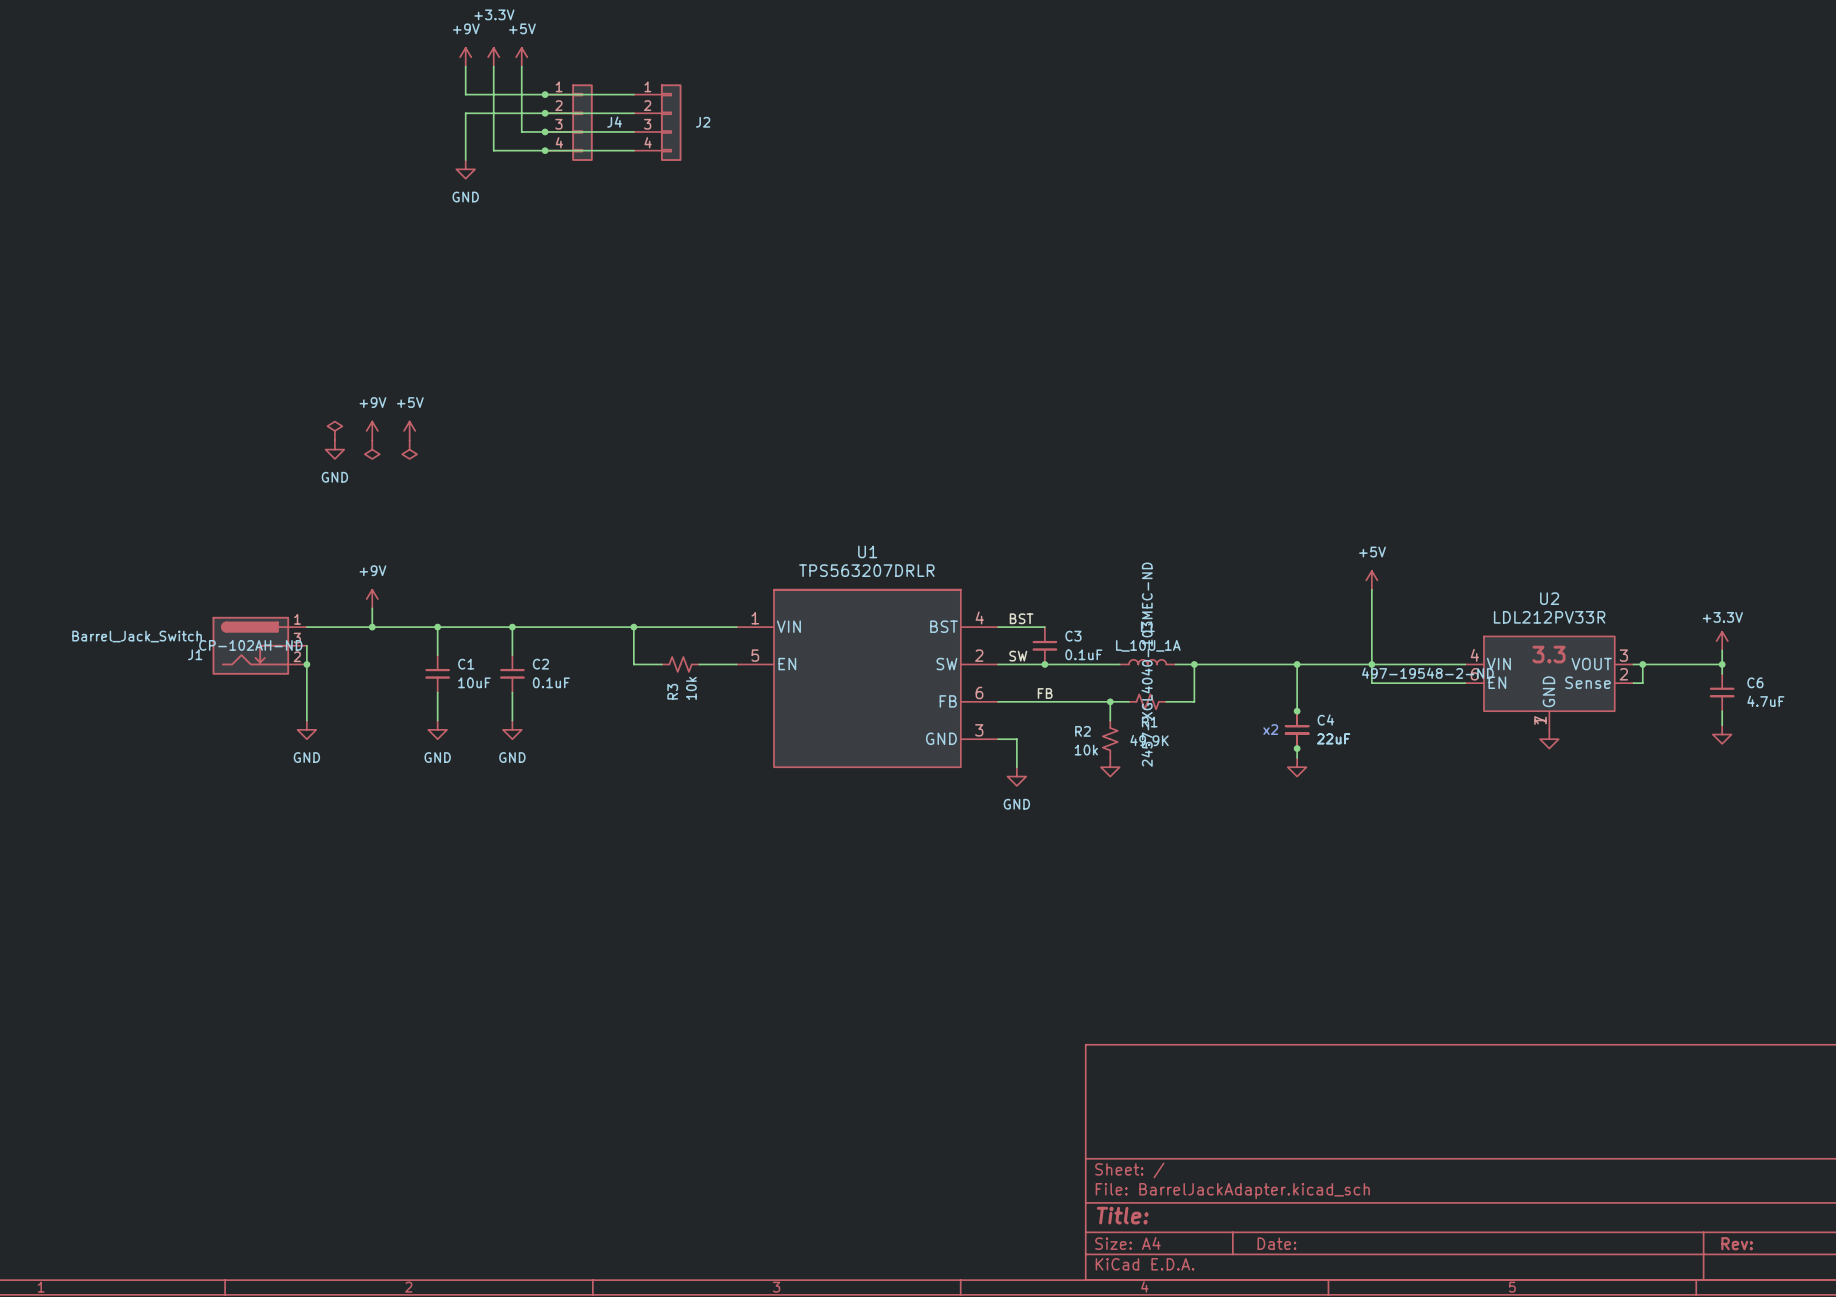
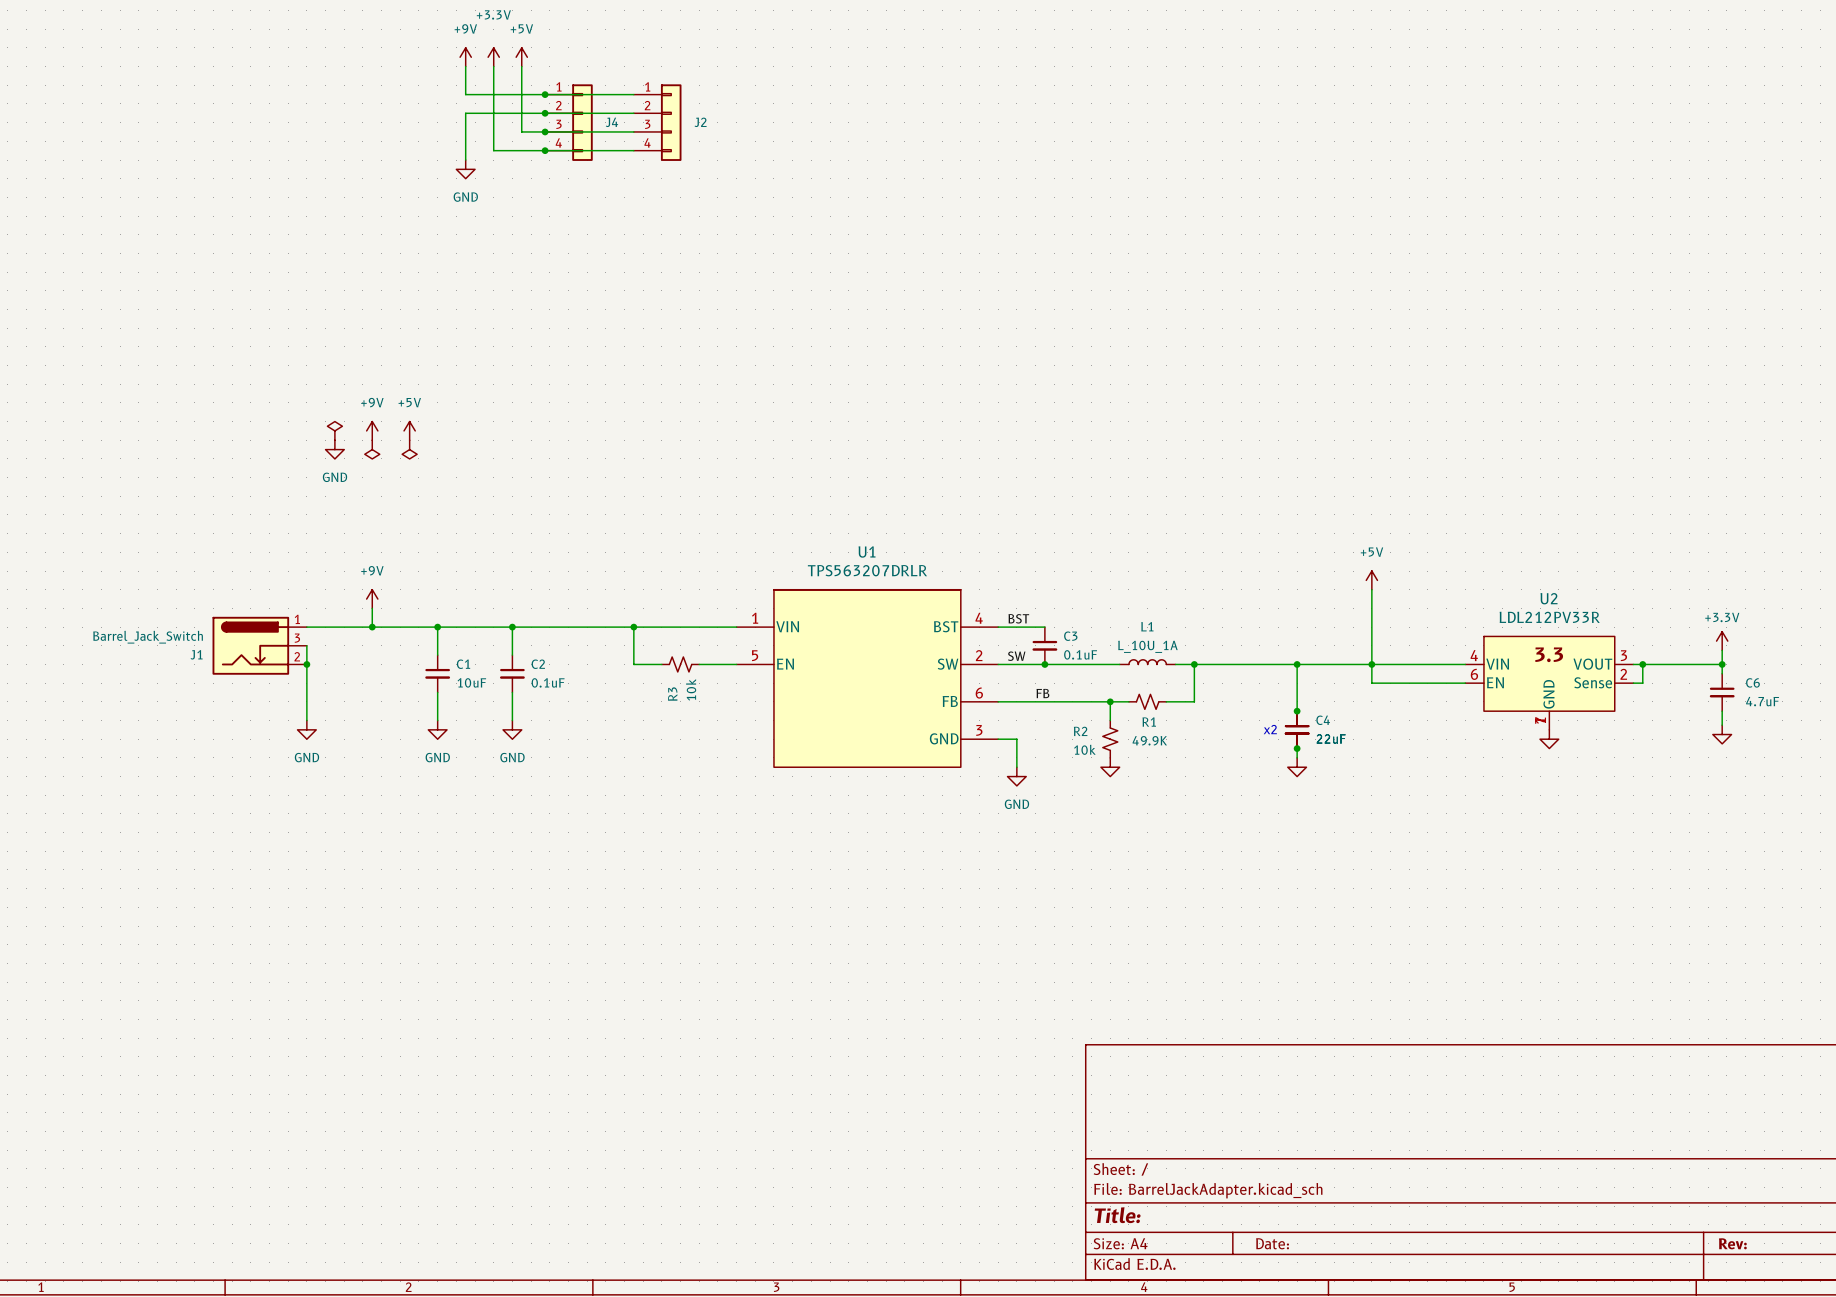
J1 text: CP-102AH-ND (250, 645) -> none
L1 text: 2457-XGL4040-103MEC-ND (1147, 664) -> none
U2 text: 497-19548-2-ND (1427, 673) -> none

